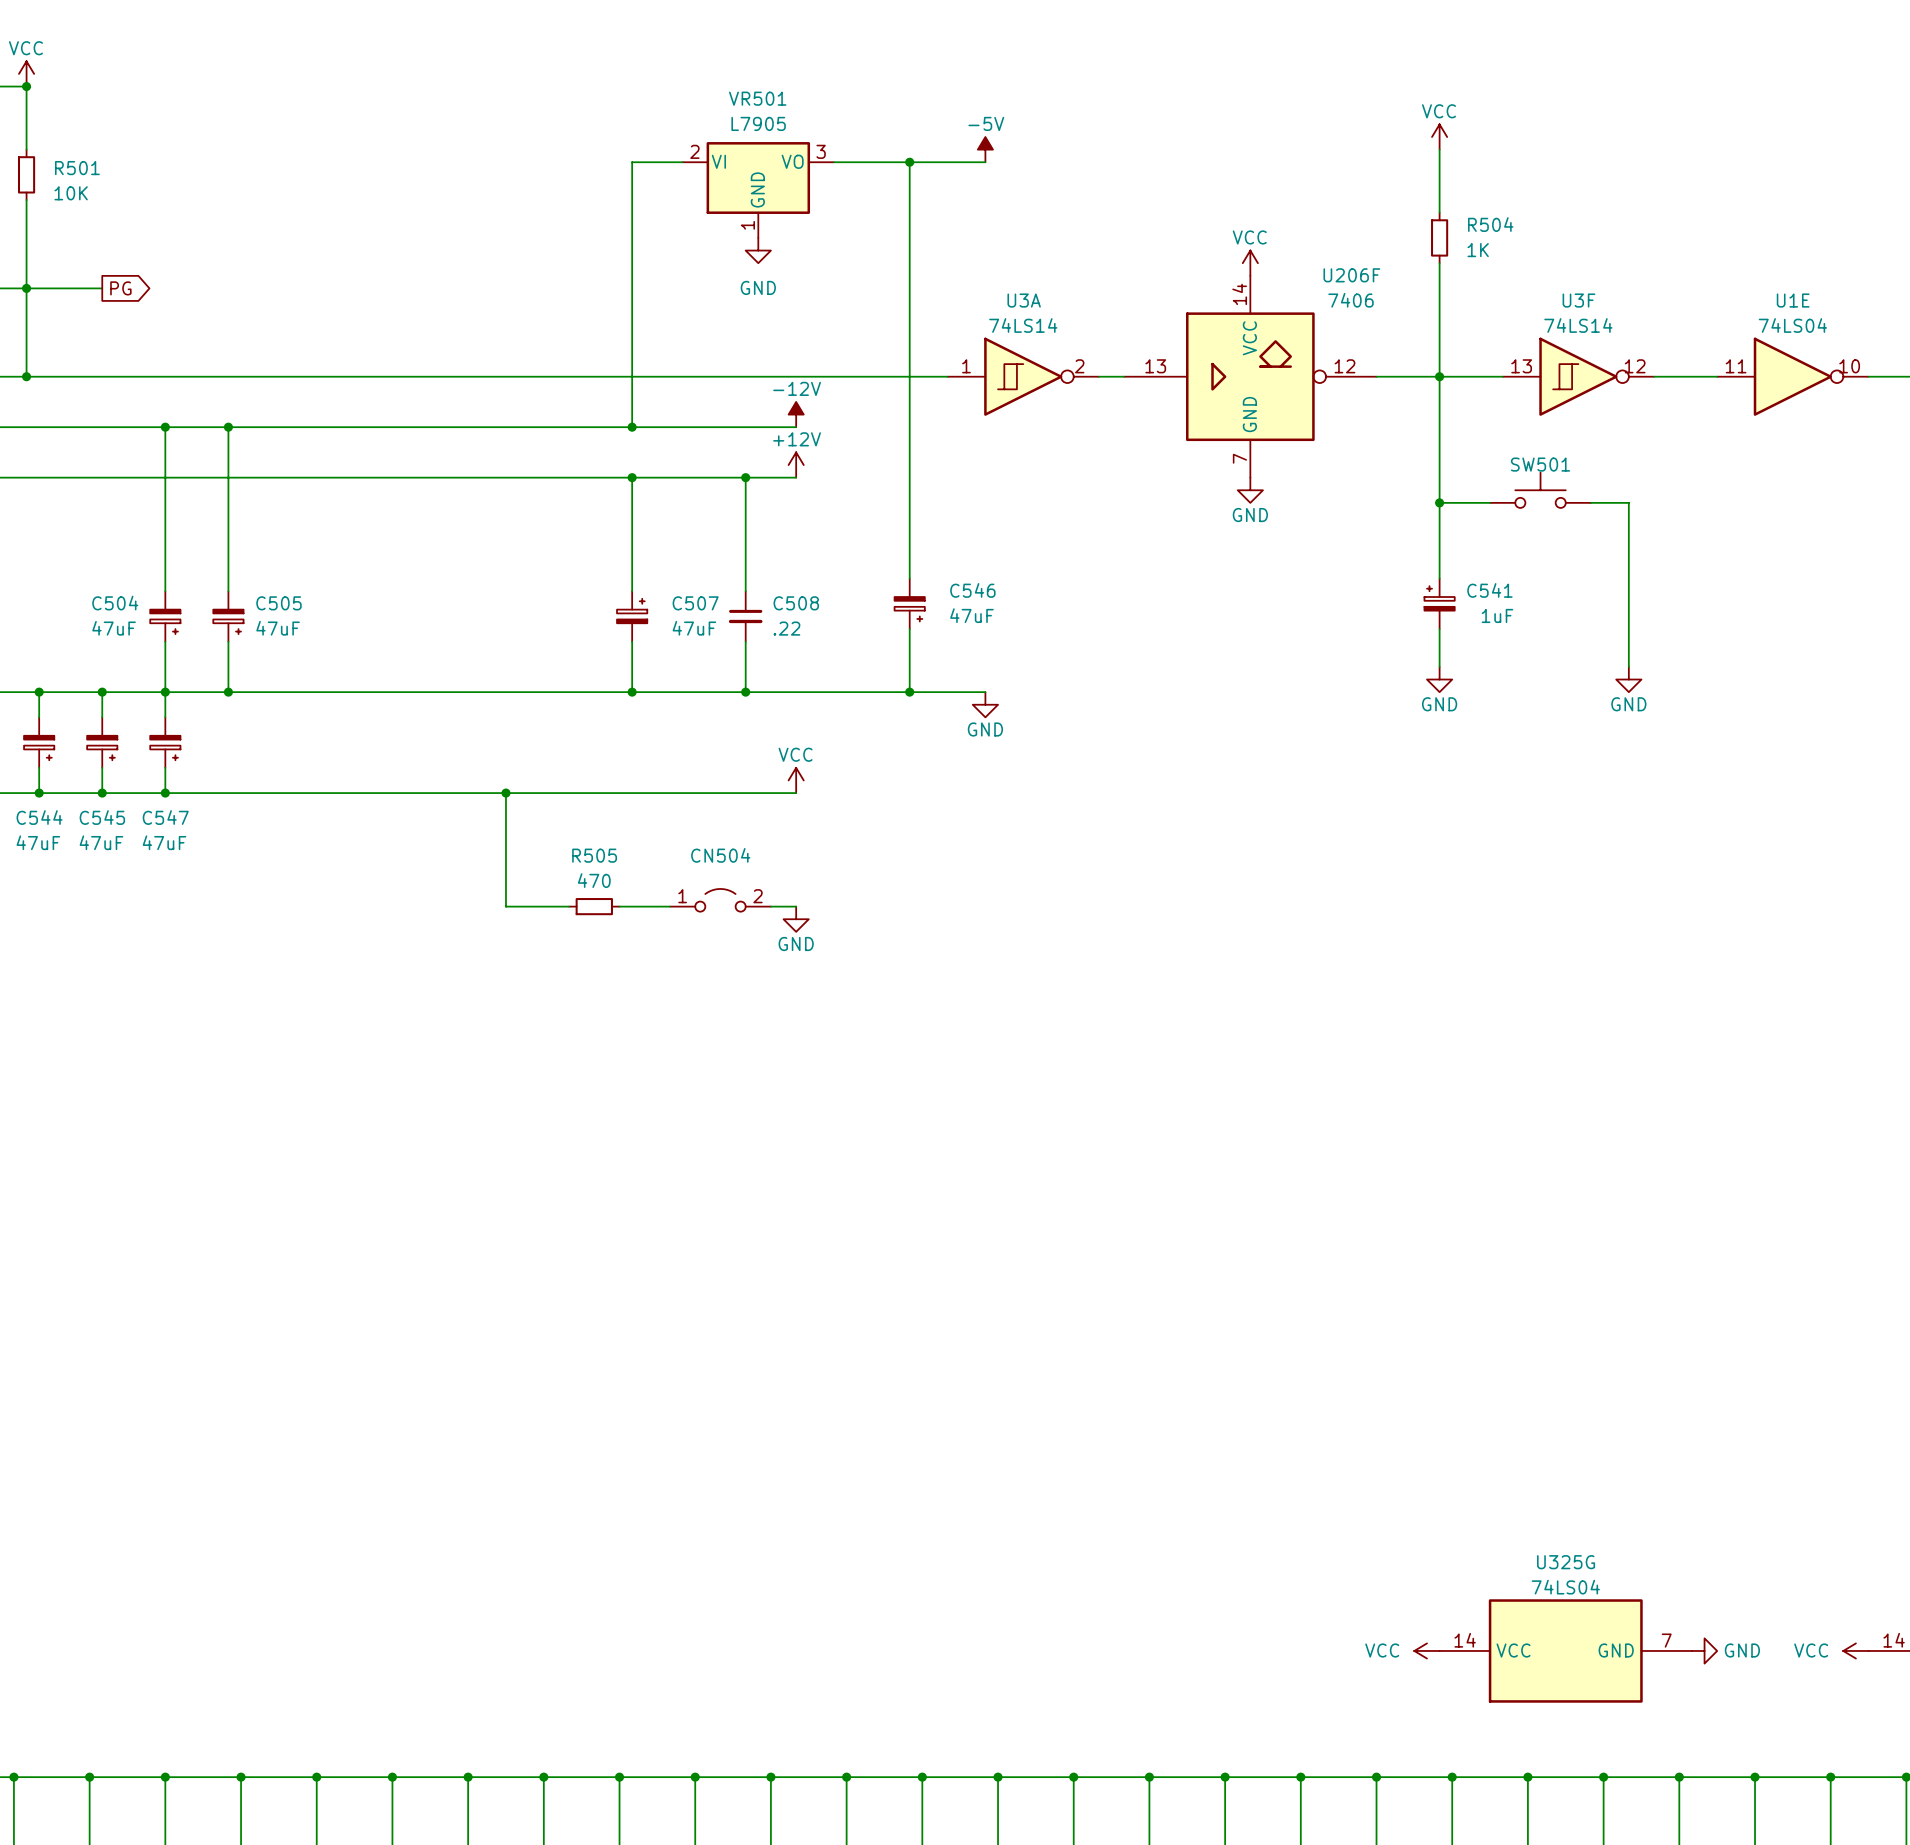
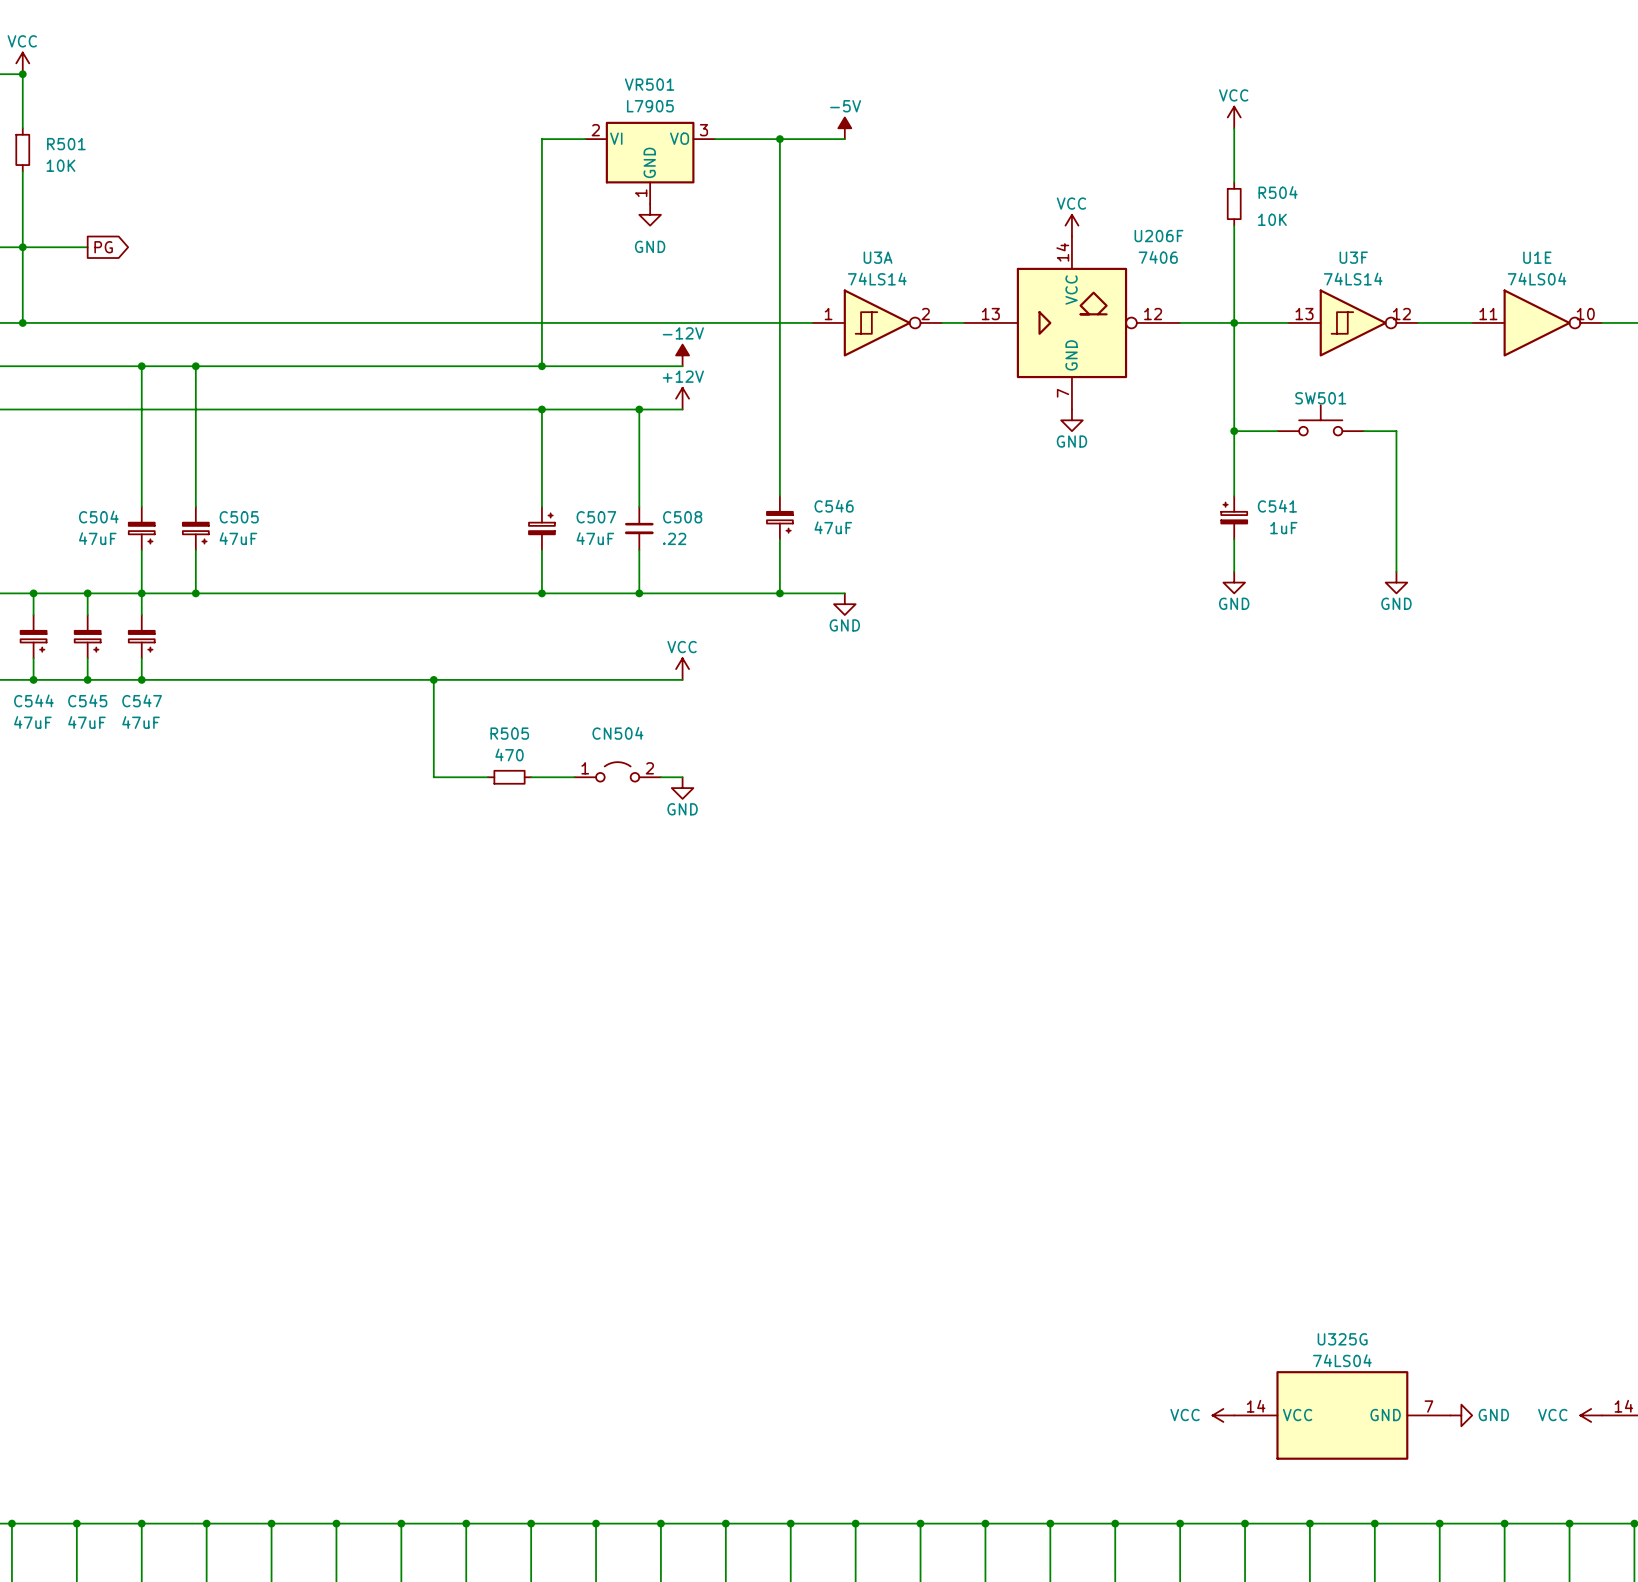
R504 value: 1K (1478, 250) -> 10K (1272, 219)

